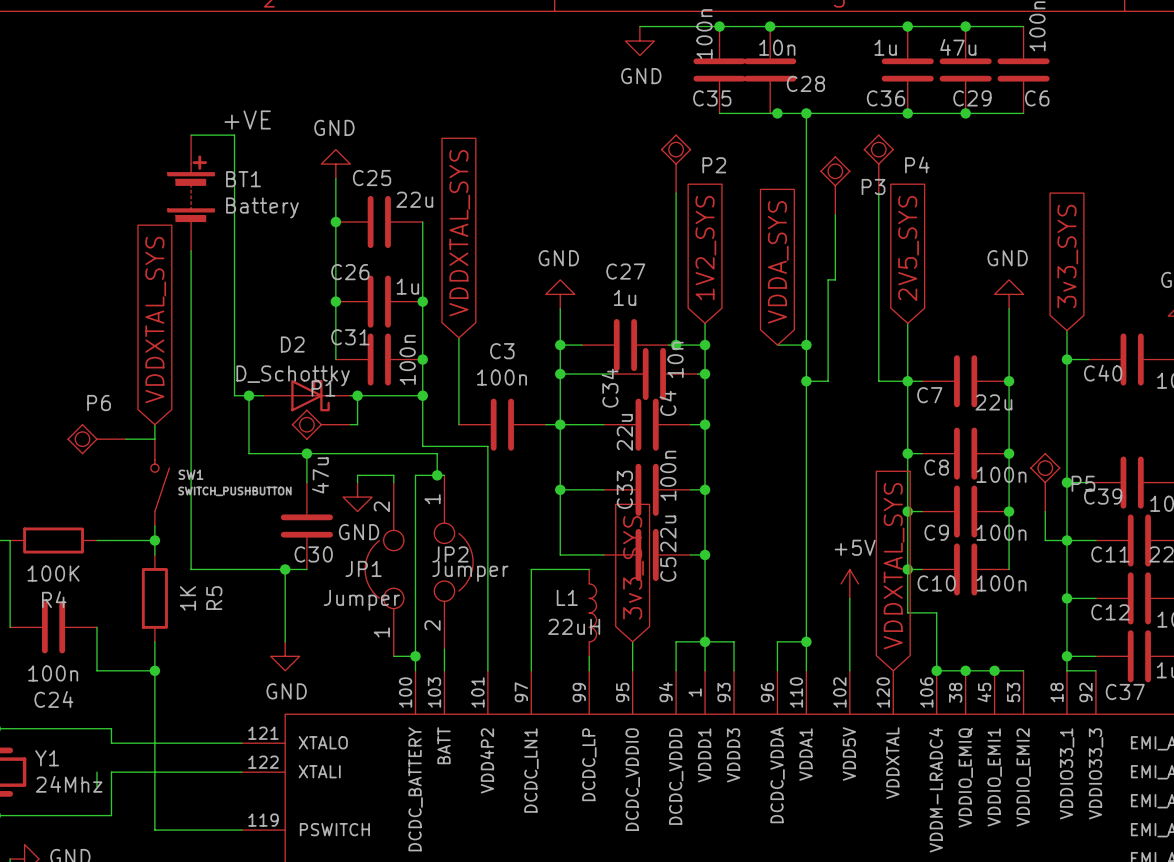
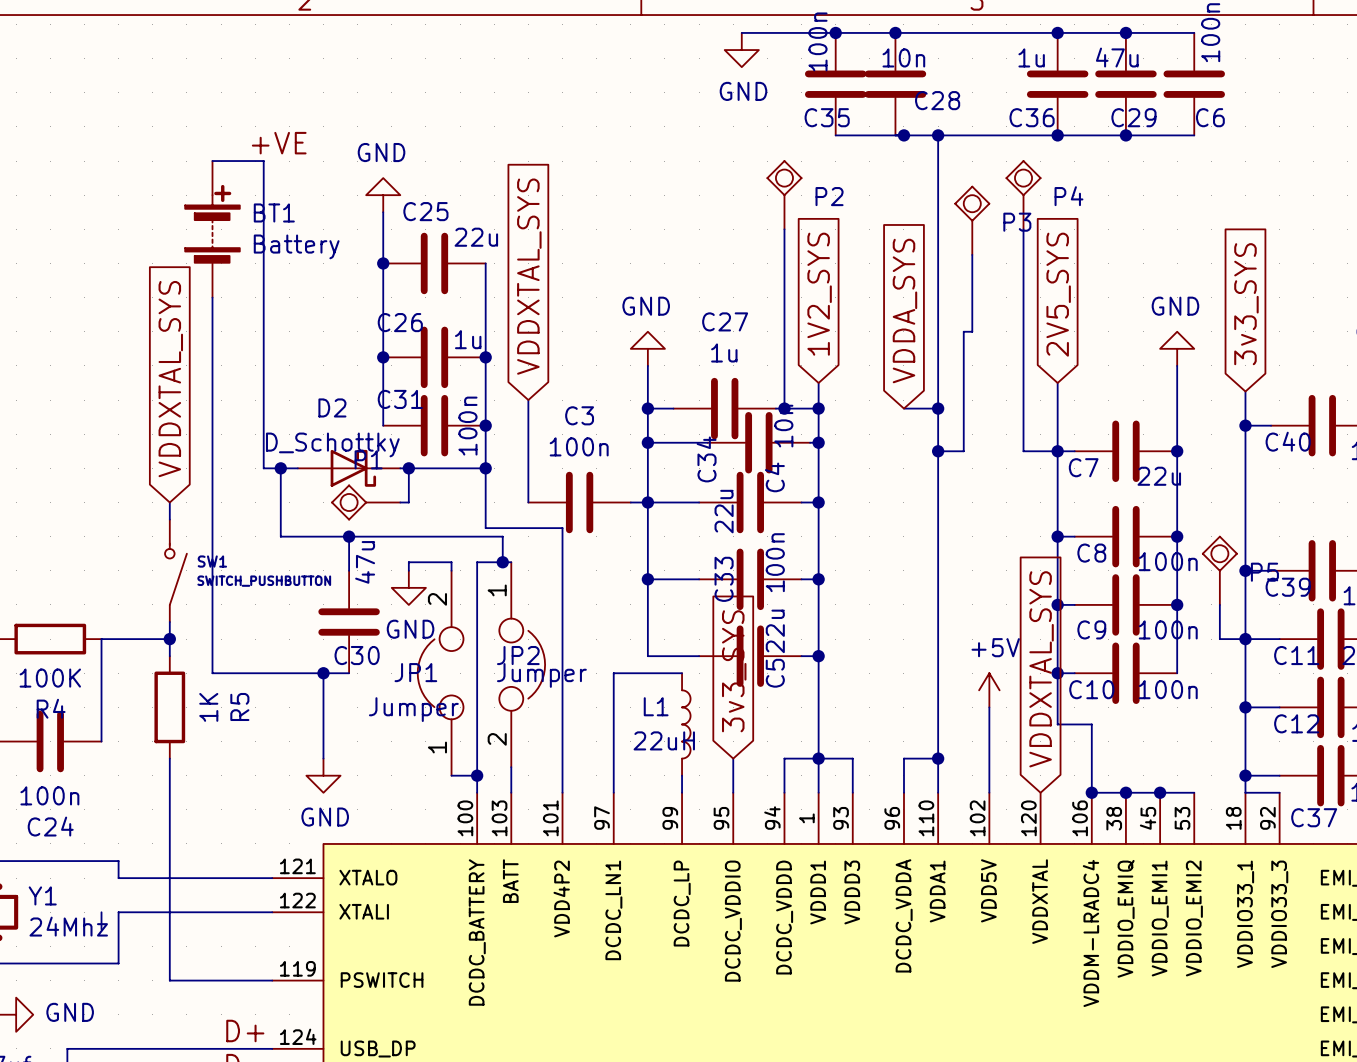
P6: (96, 439) -> none
wire: (125, 439) (154, 439) -> none
wire: (96, 627) (96, 670) (154, 670) -> (101, 741) (101, 639)
junction: (154, 670) -> none

